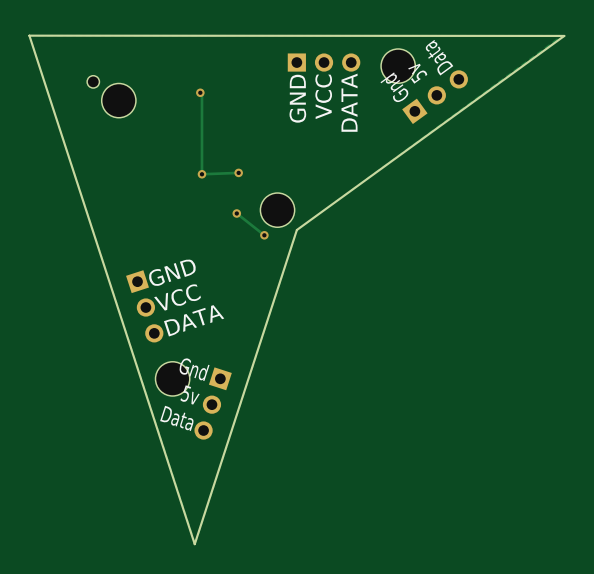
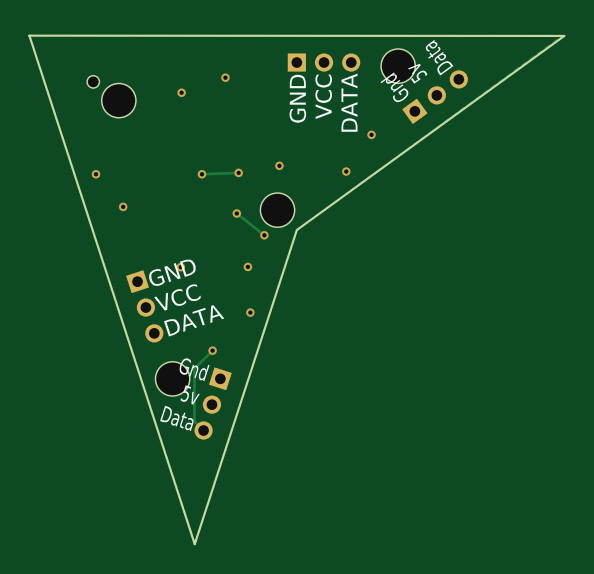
via: none -> (225, 77)
via: none -> (181, 92)
track: (200, 92) (201, 94) (201, 174) -> none
via: (200, 92) -> none
via: none -> (371, 134)
via: none -> (279, 165)
via: none -> (346, 171)
via: none -> (96, 174)
via: none -> (123, 206)
via: none -> (247, 266)
via: none -> (180, 267)
via: none -> (250, 312)
track: none -> (212, 350) (194, 368) (194, 421) (203, 430)
via: none -> (212, 350)

